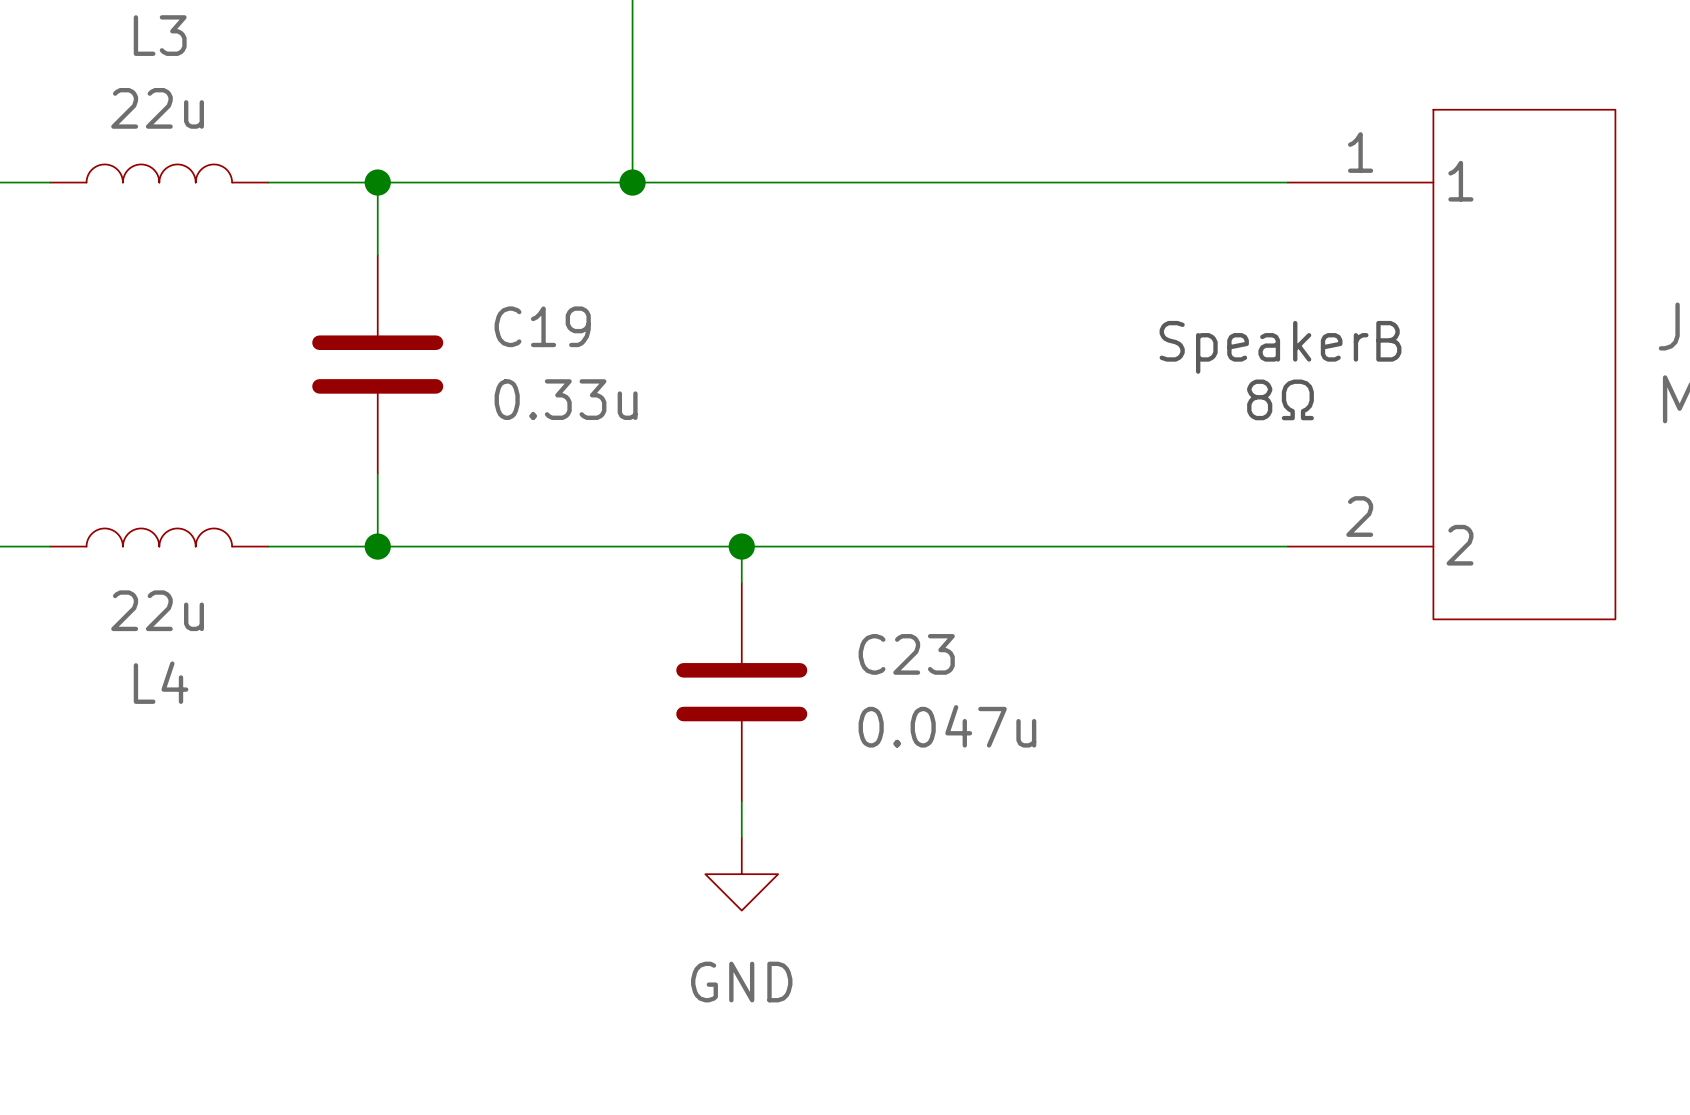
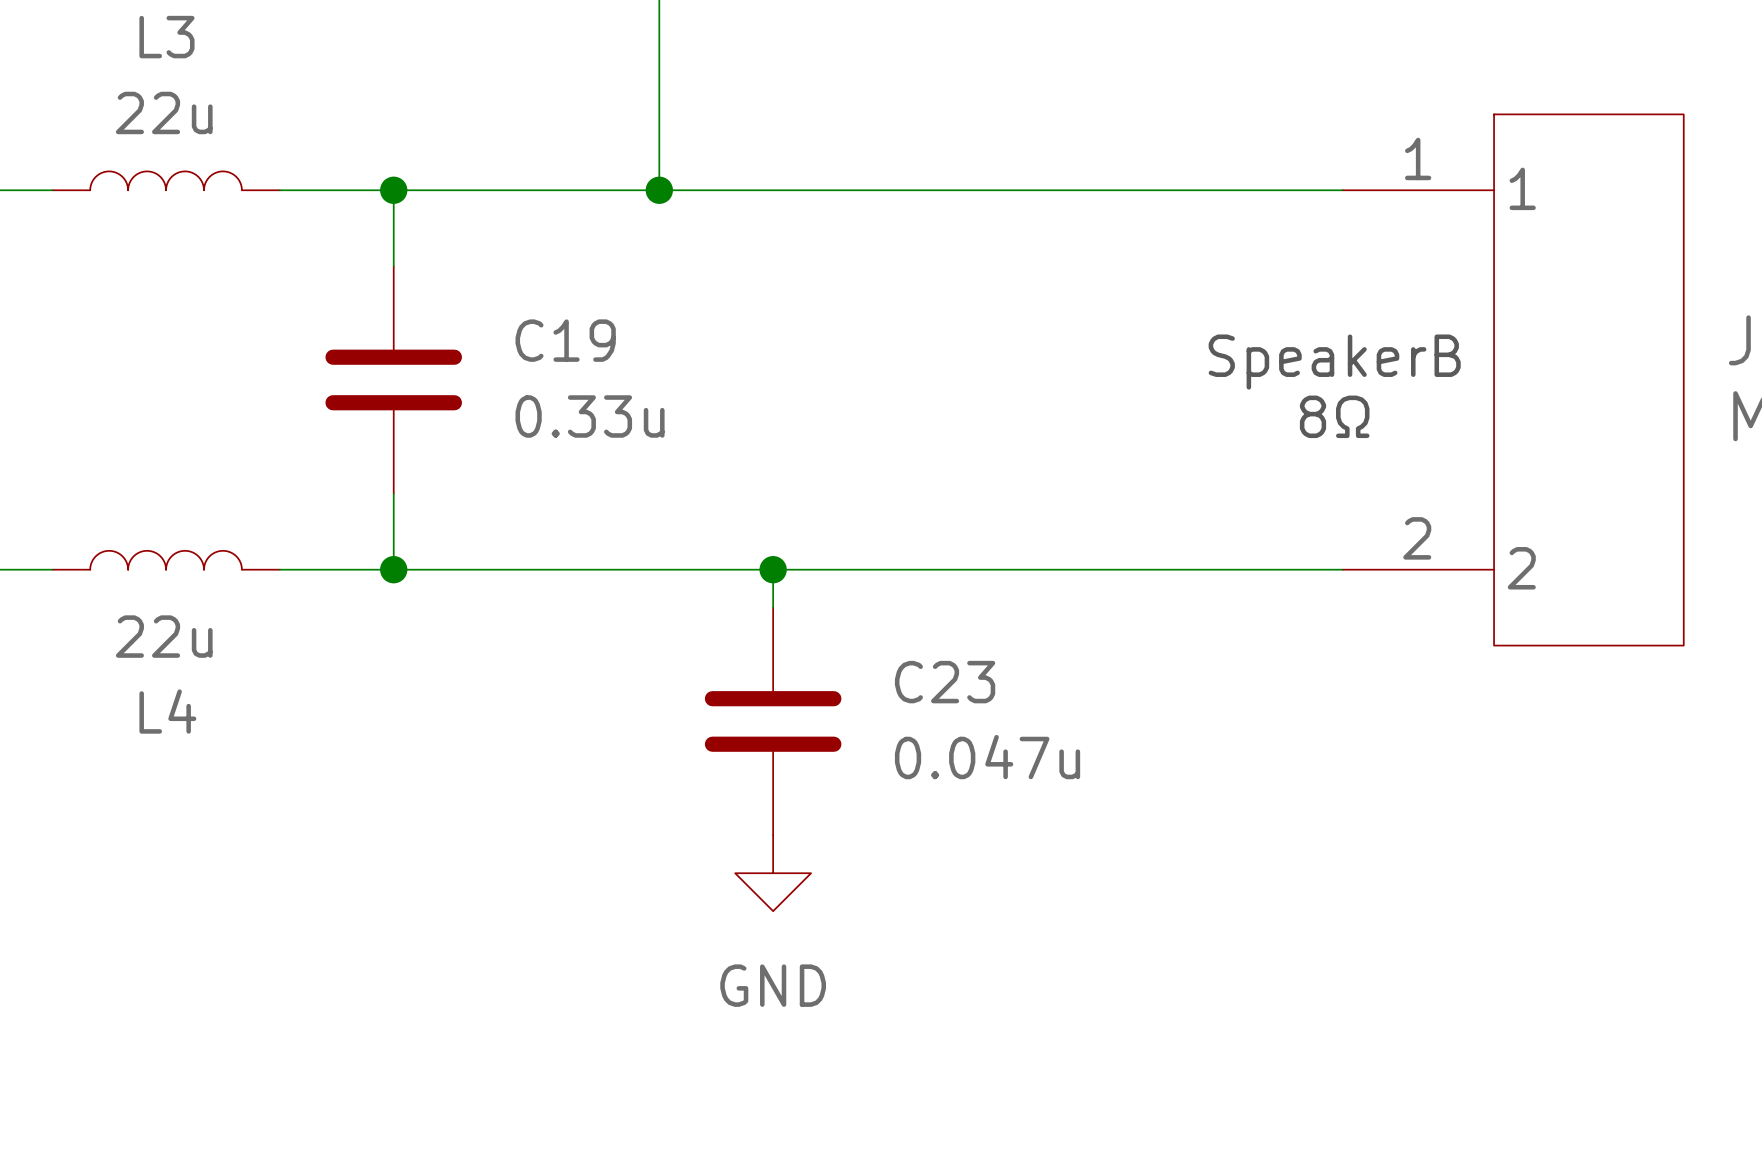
power symbol position: GND (741, 874) -> GND (773, 873)

